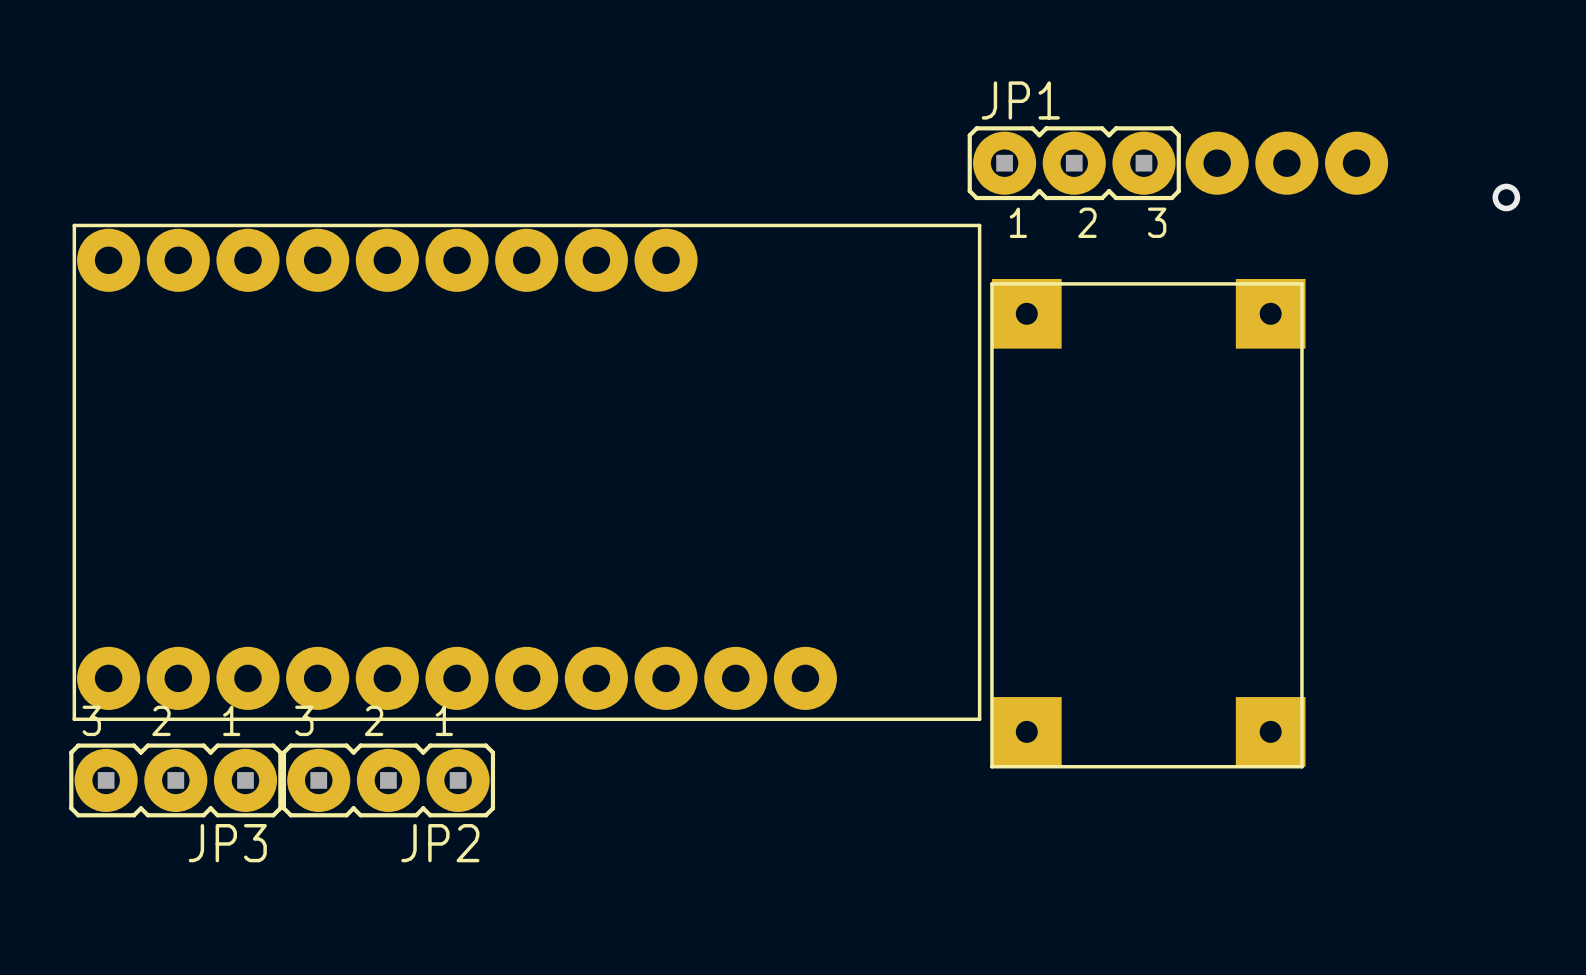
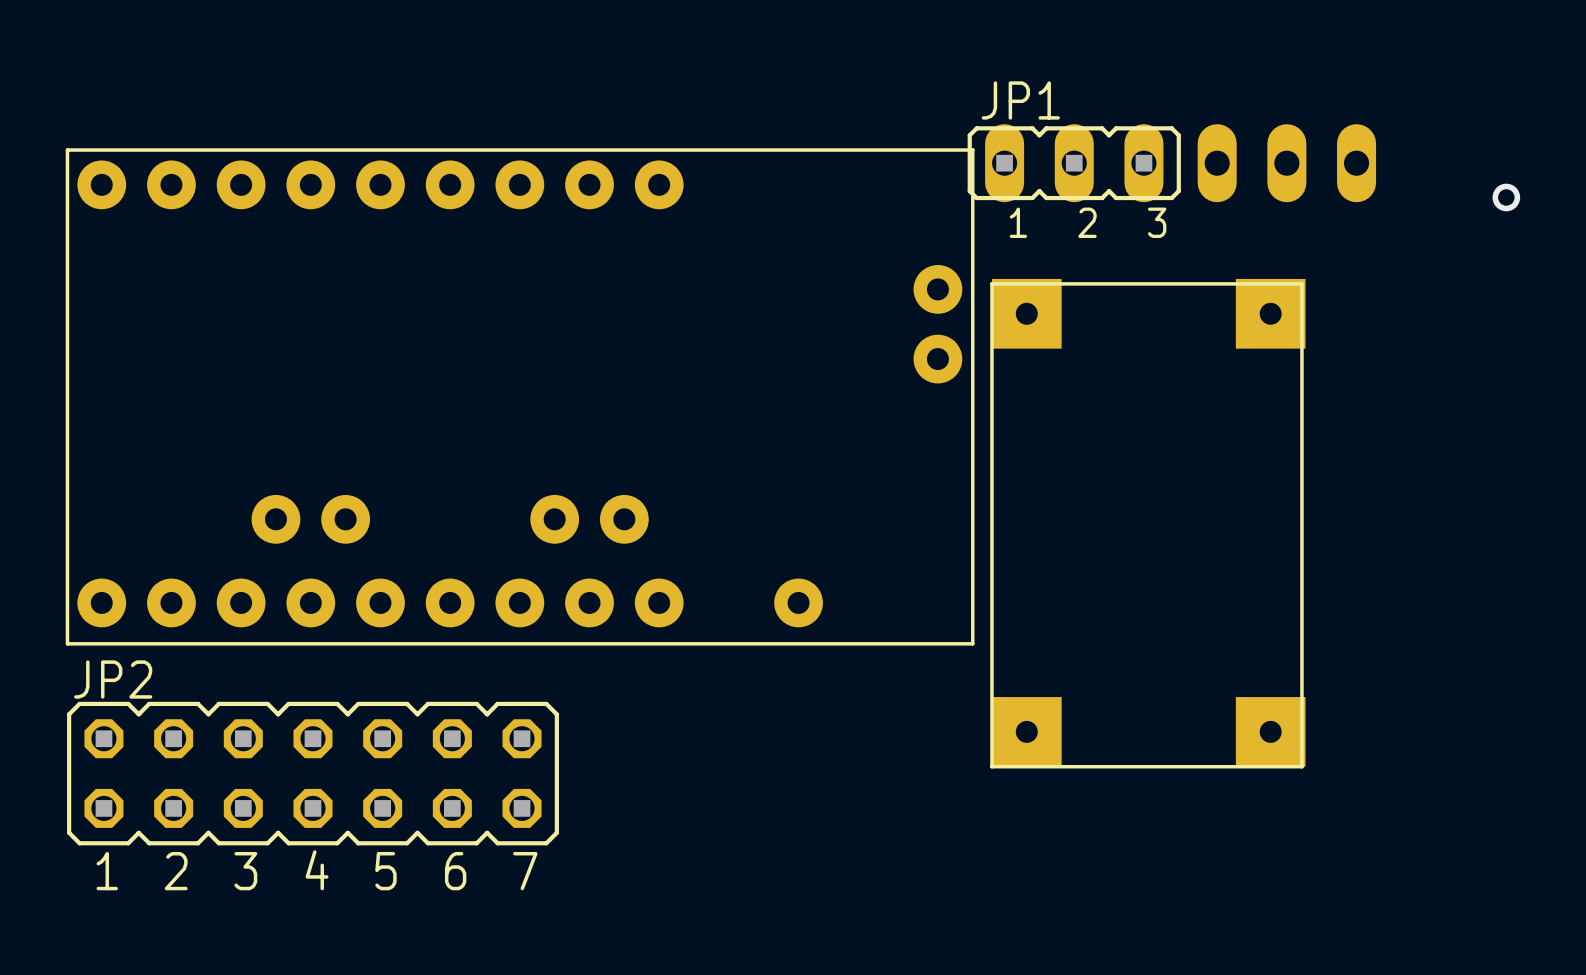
JP1 footprint: [967, 126, 1181, 201] -> [967, 124, 1181, 203]
part footprint: [1185, 131, 1389, 195] -> [1197, 124, 1377, 203]
part: none -> (520, 396)
part: (526, 472) -> none
JP2 footprint: [281, 743, 496, 818] -> [67, 701, 559, 846]
JP3: (175, 780) -> none
JP2 name position: JP2 (440, 843) -> JP2 (113, 679)

